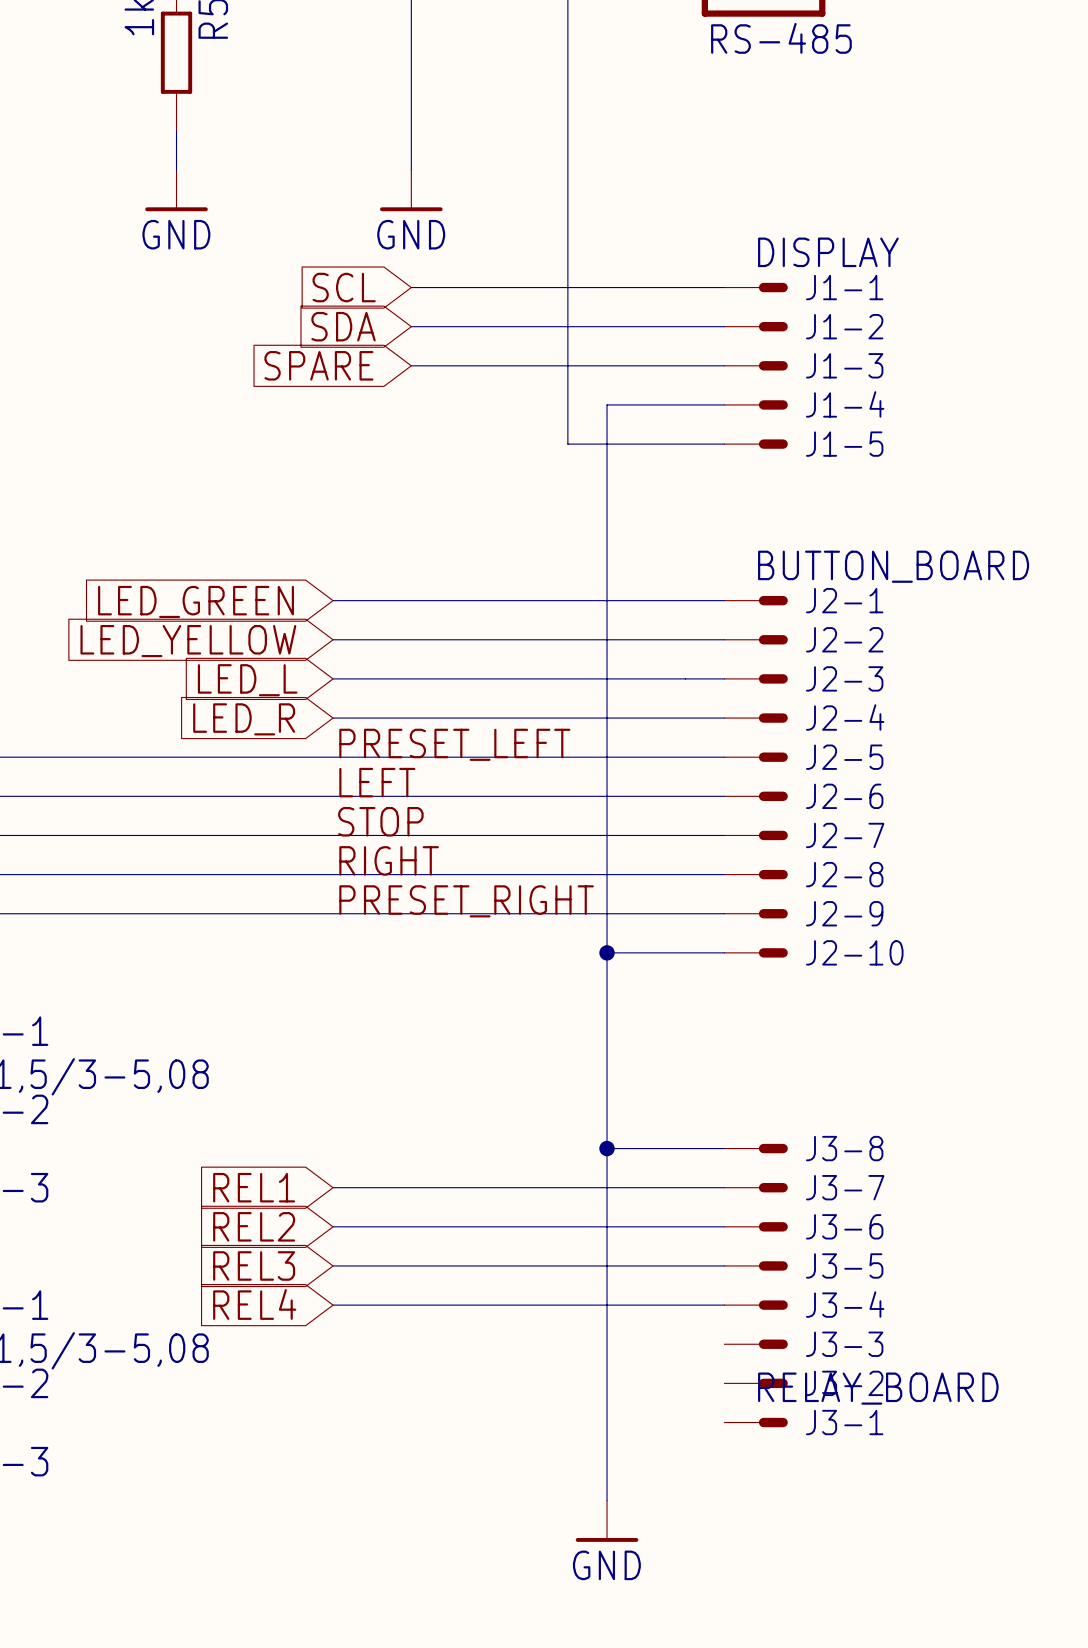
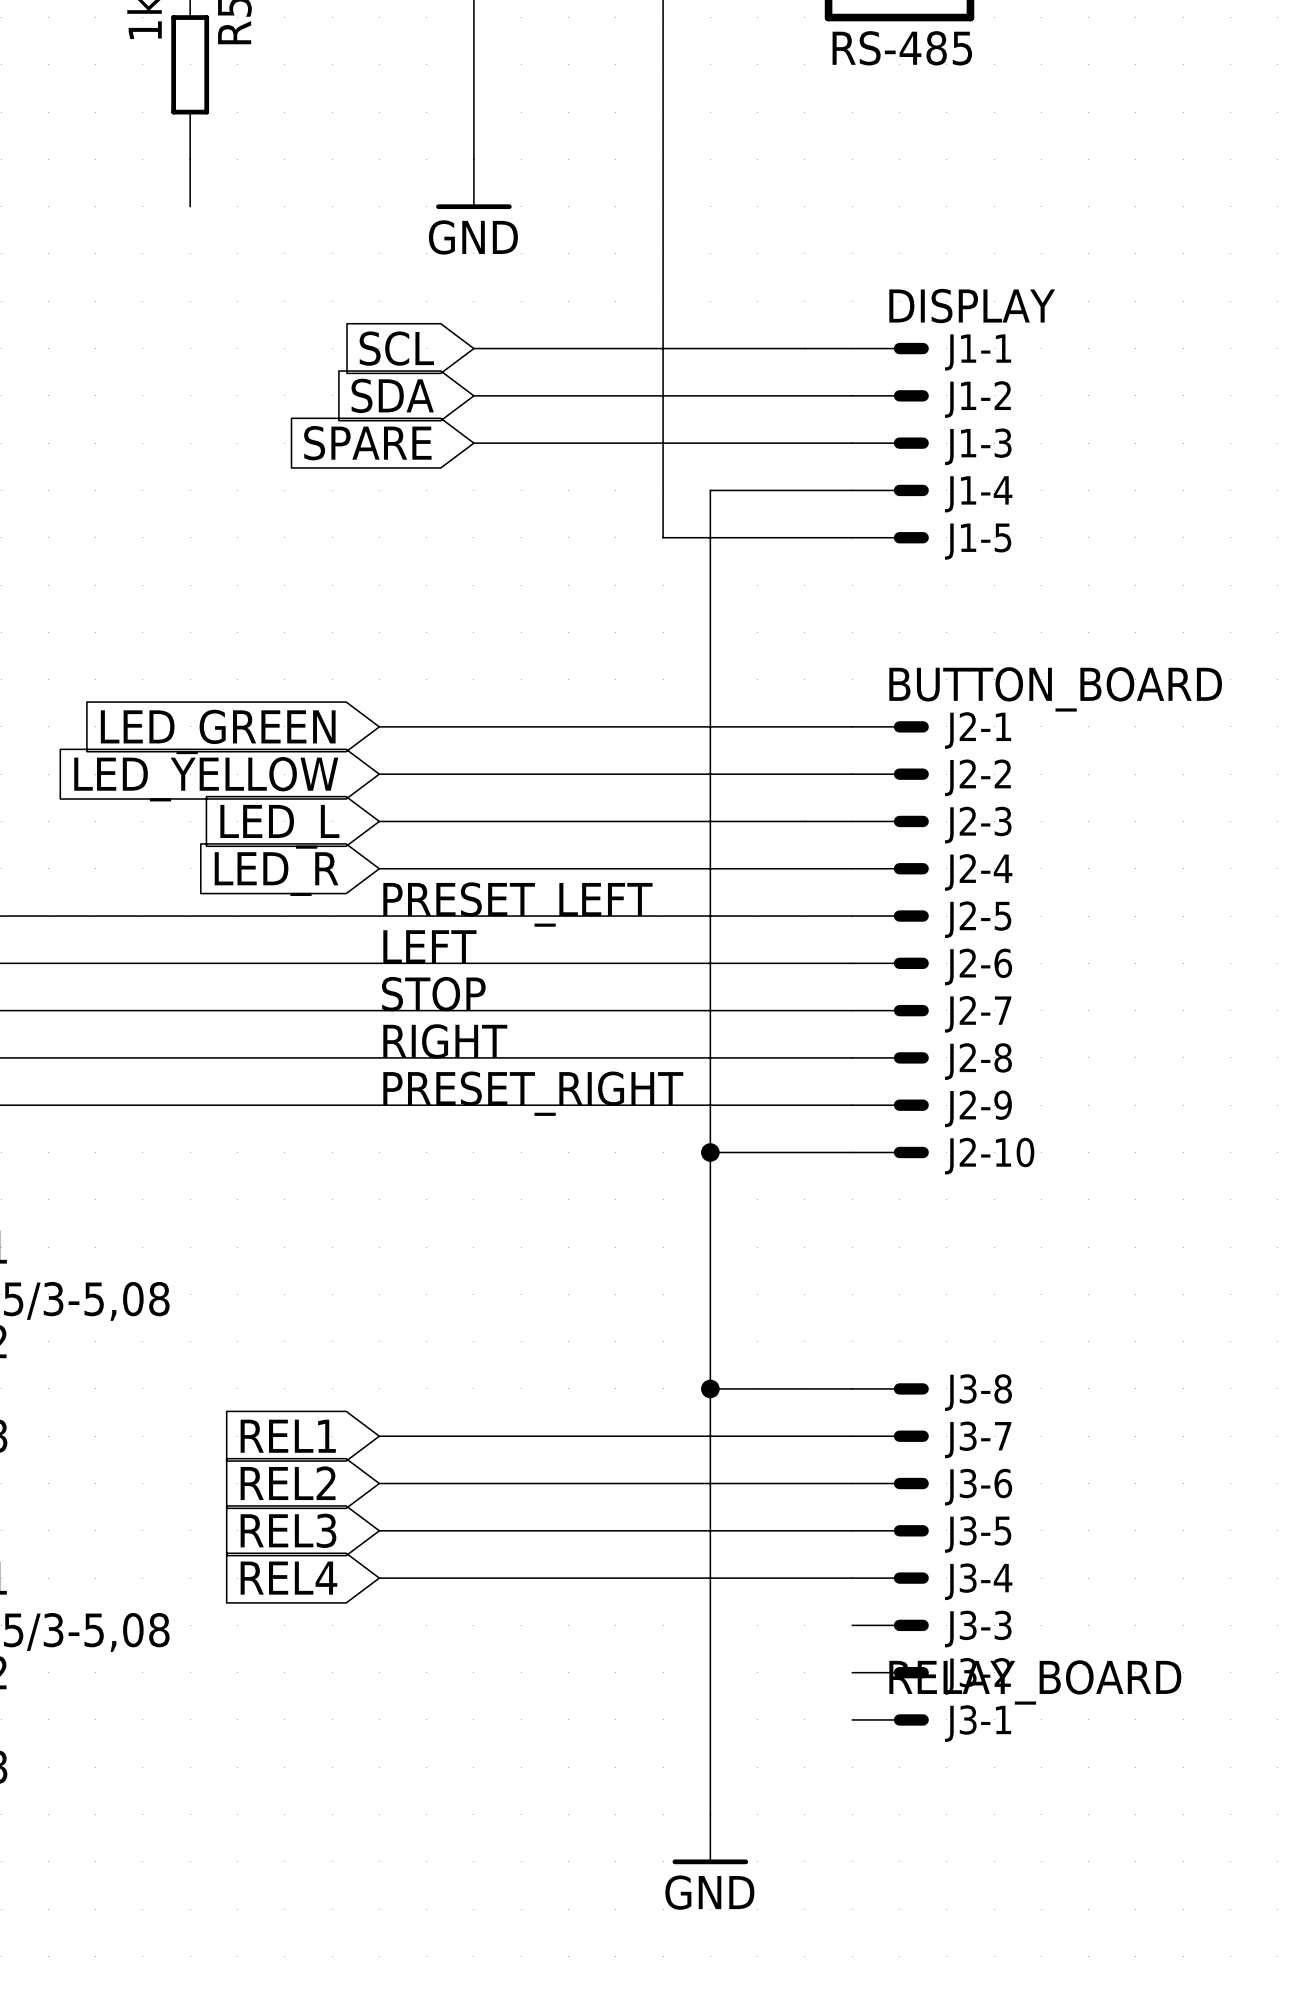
power symbol: GND (176, 190) -> none
power symbol position: GND (411, 190) -> GND (473, 184)

